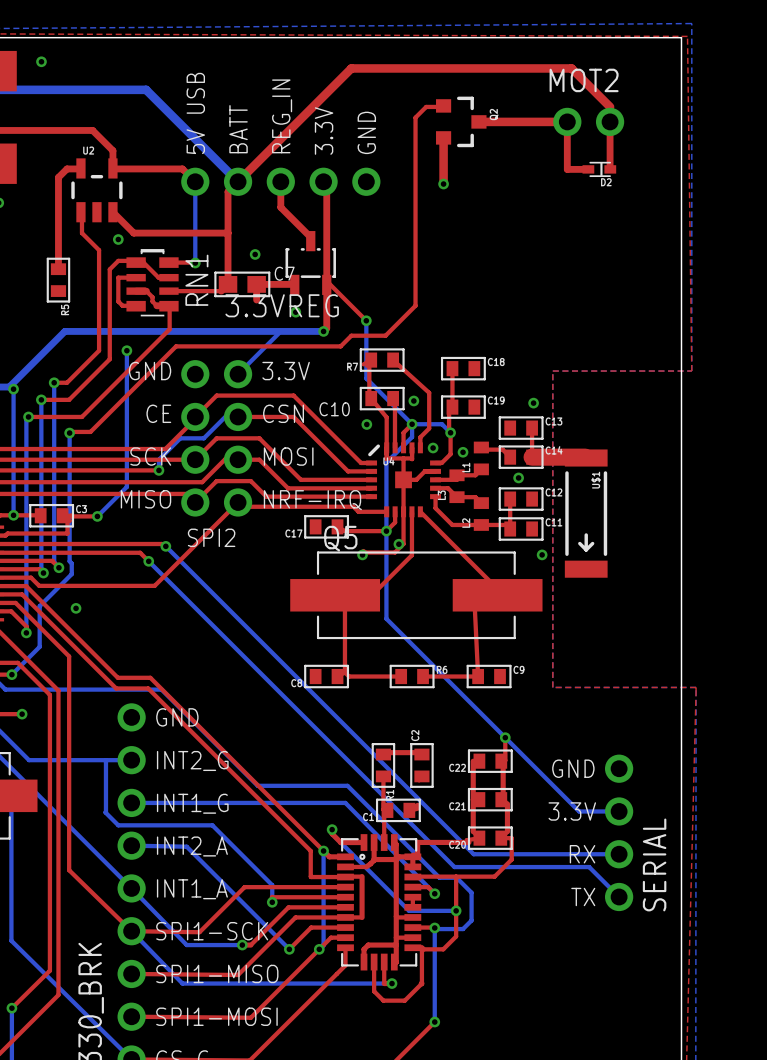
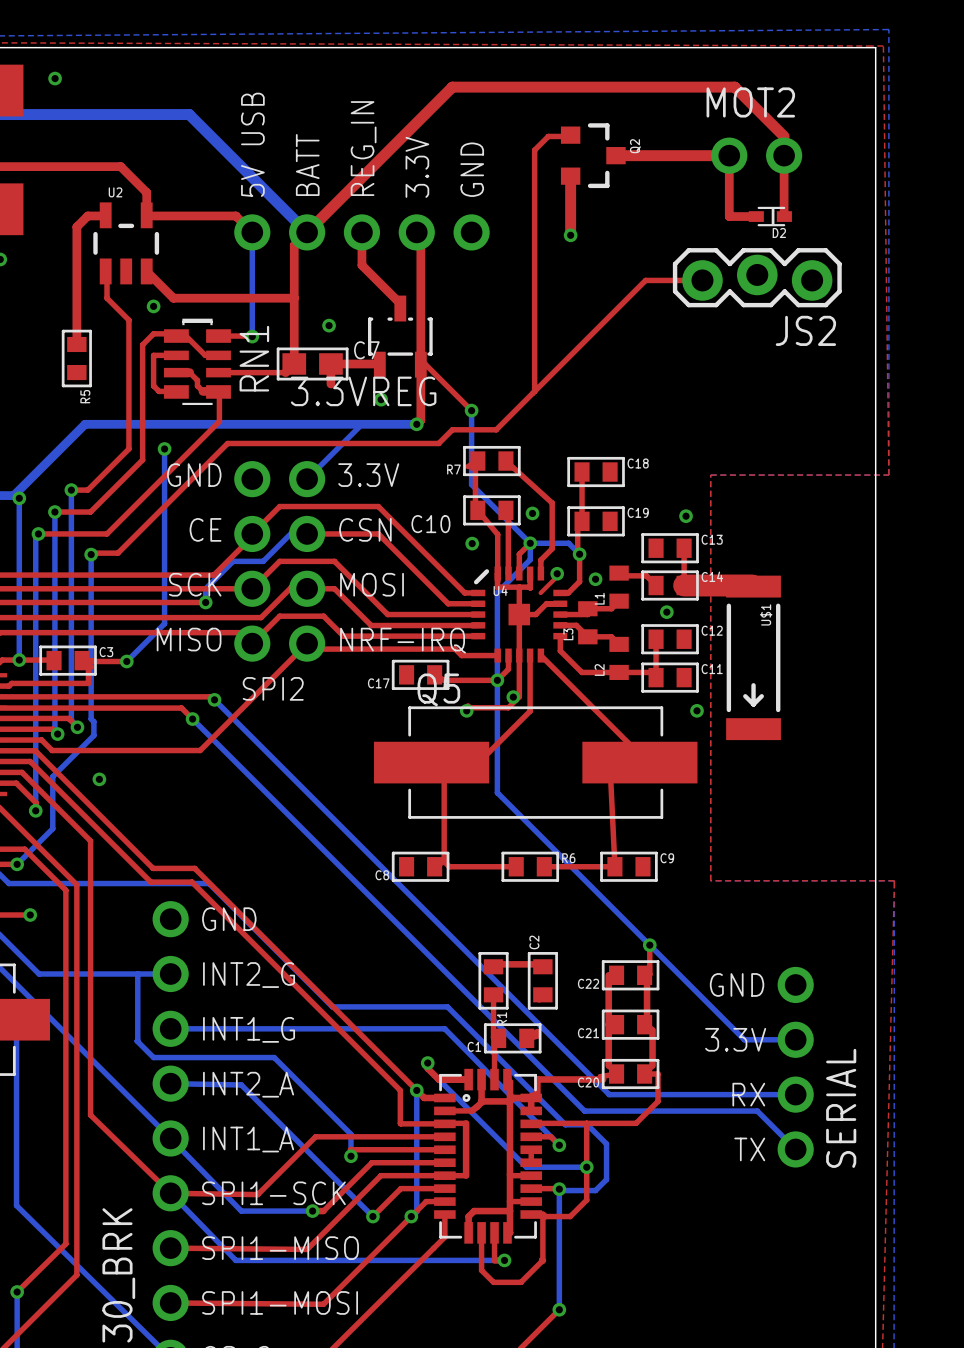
JS2: none -> (757, 277)
top track: none -> (702, 280) (645, 280) (534, 391)
top track: none -> (554, 579) (540, 592)

